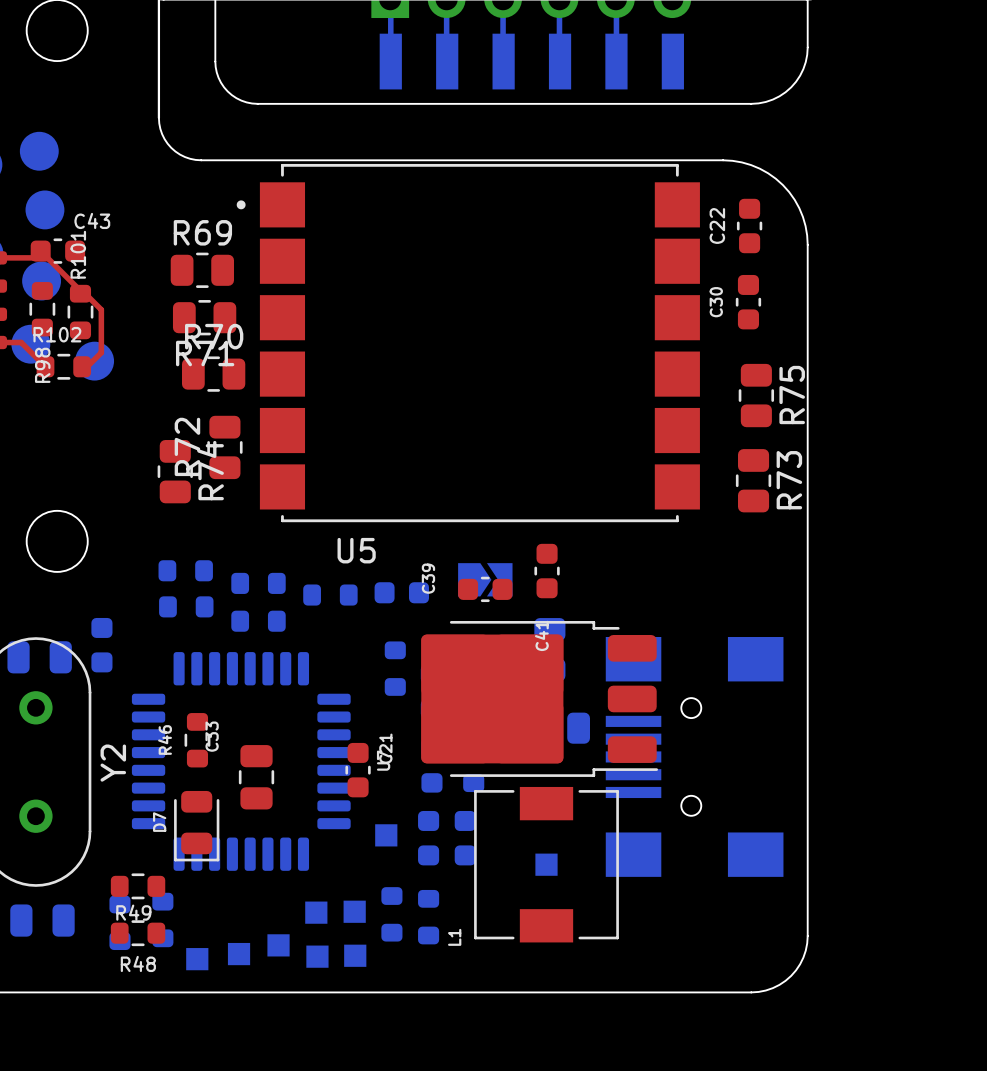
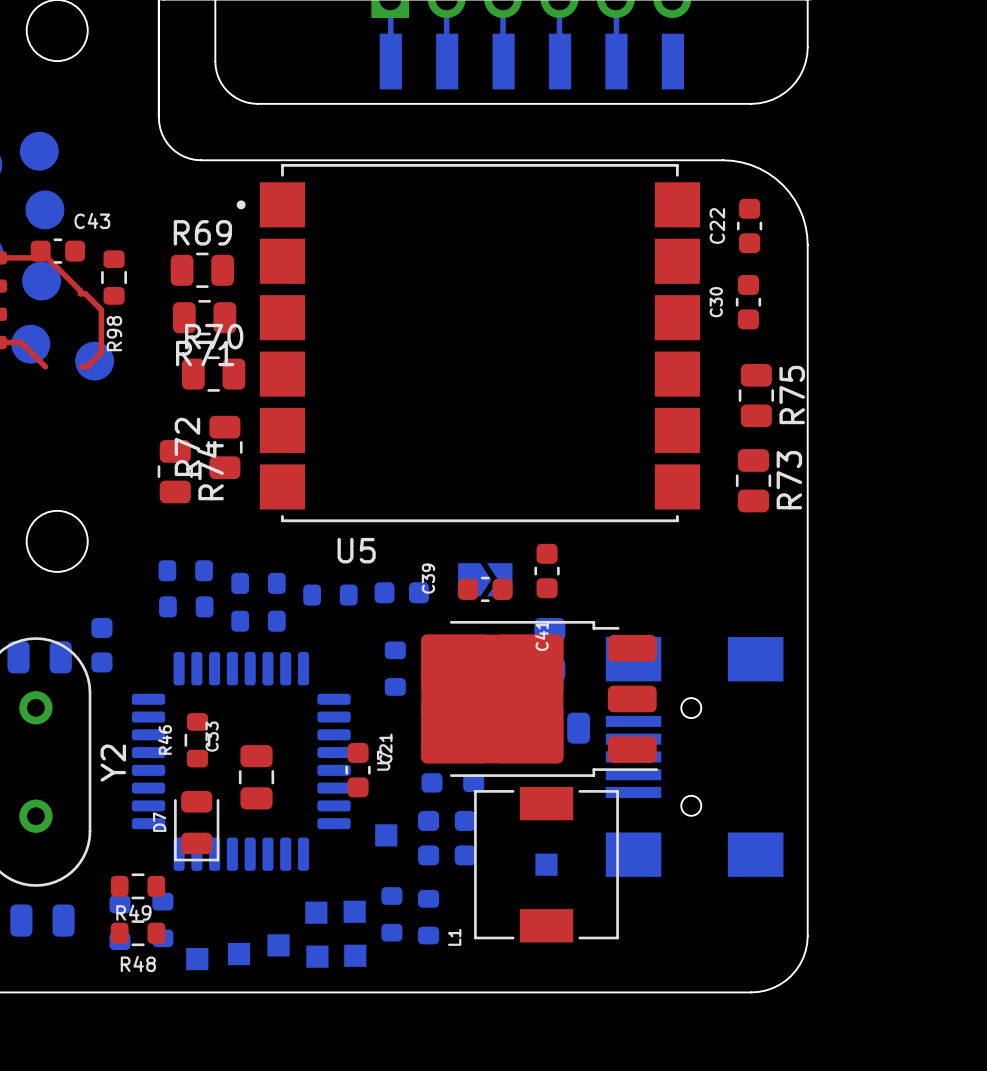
R98 position: (42, 309) -> (114, 277)
R101: (80, 312) -> none
R102: (63, 366) -> none

